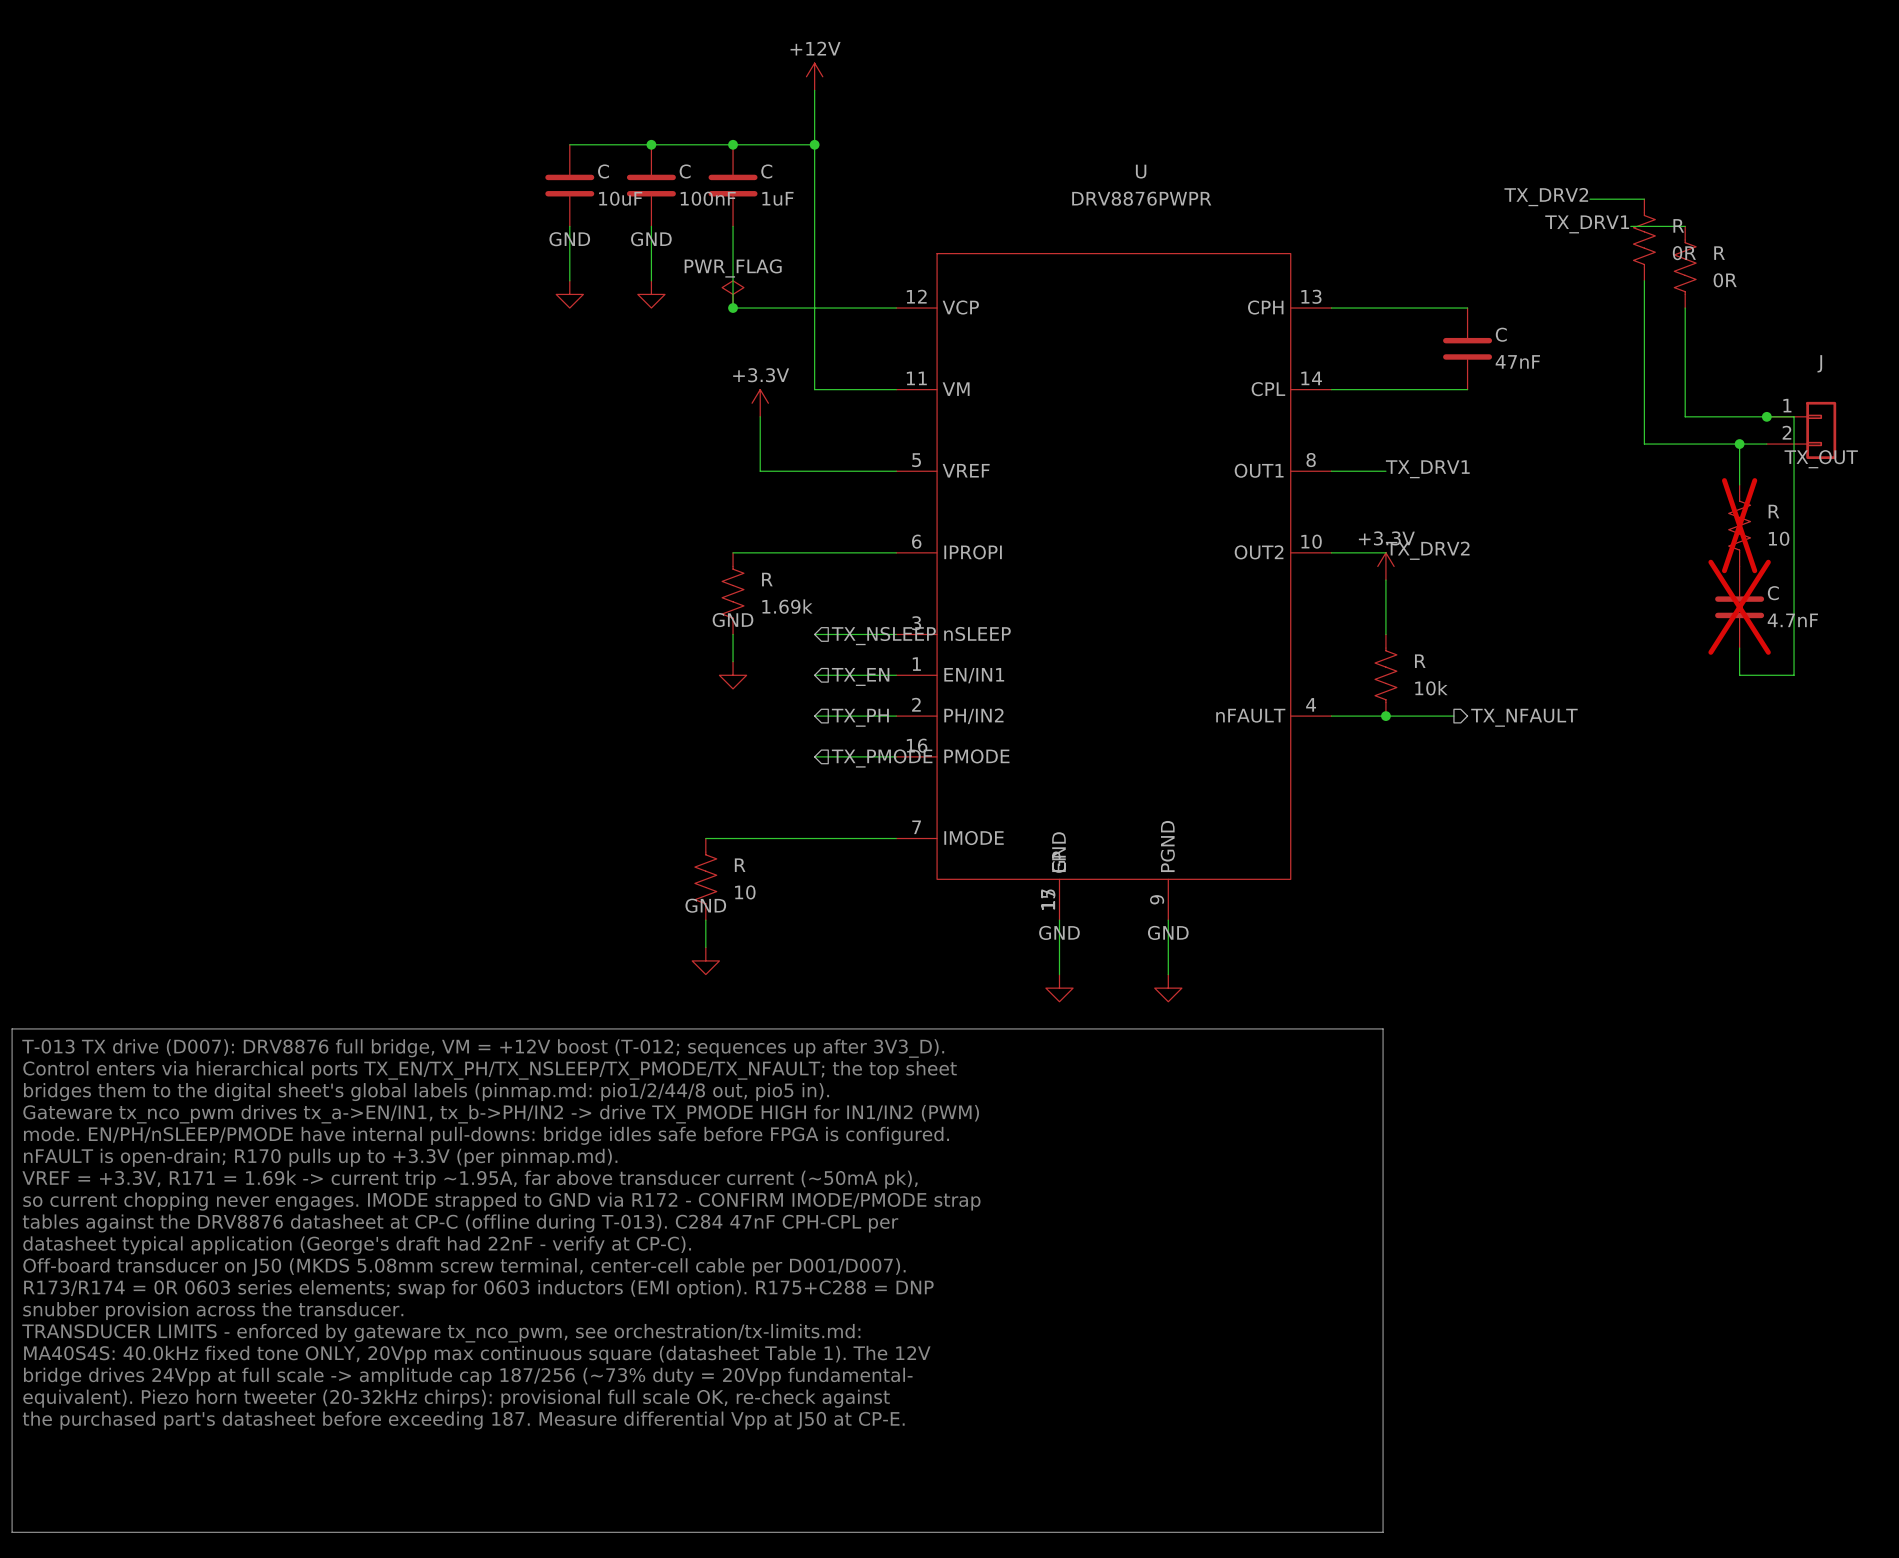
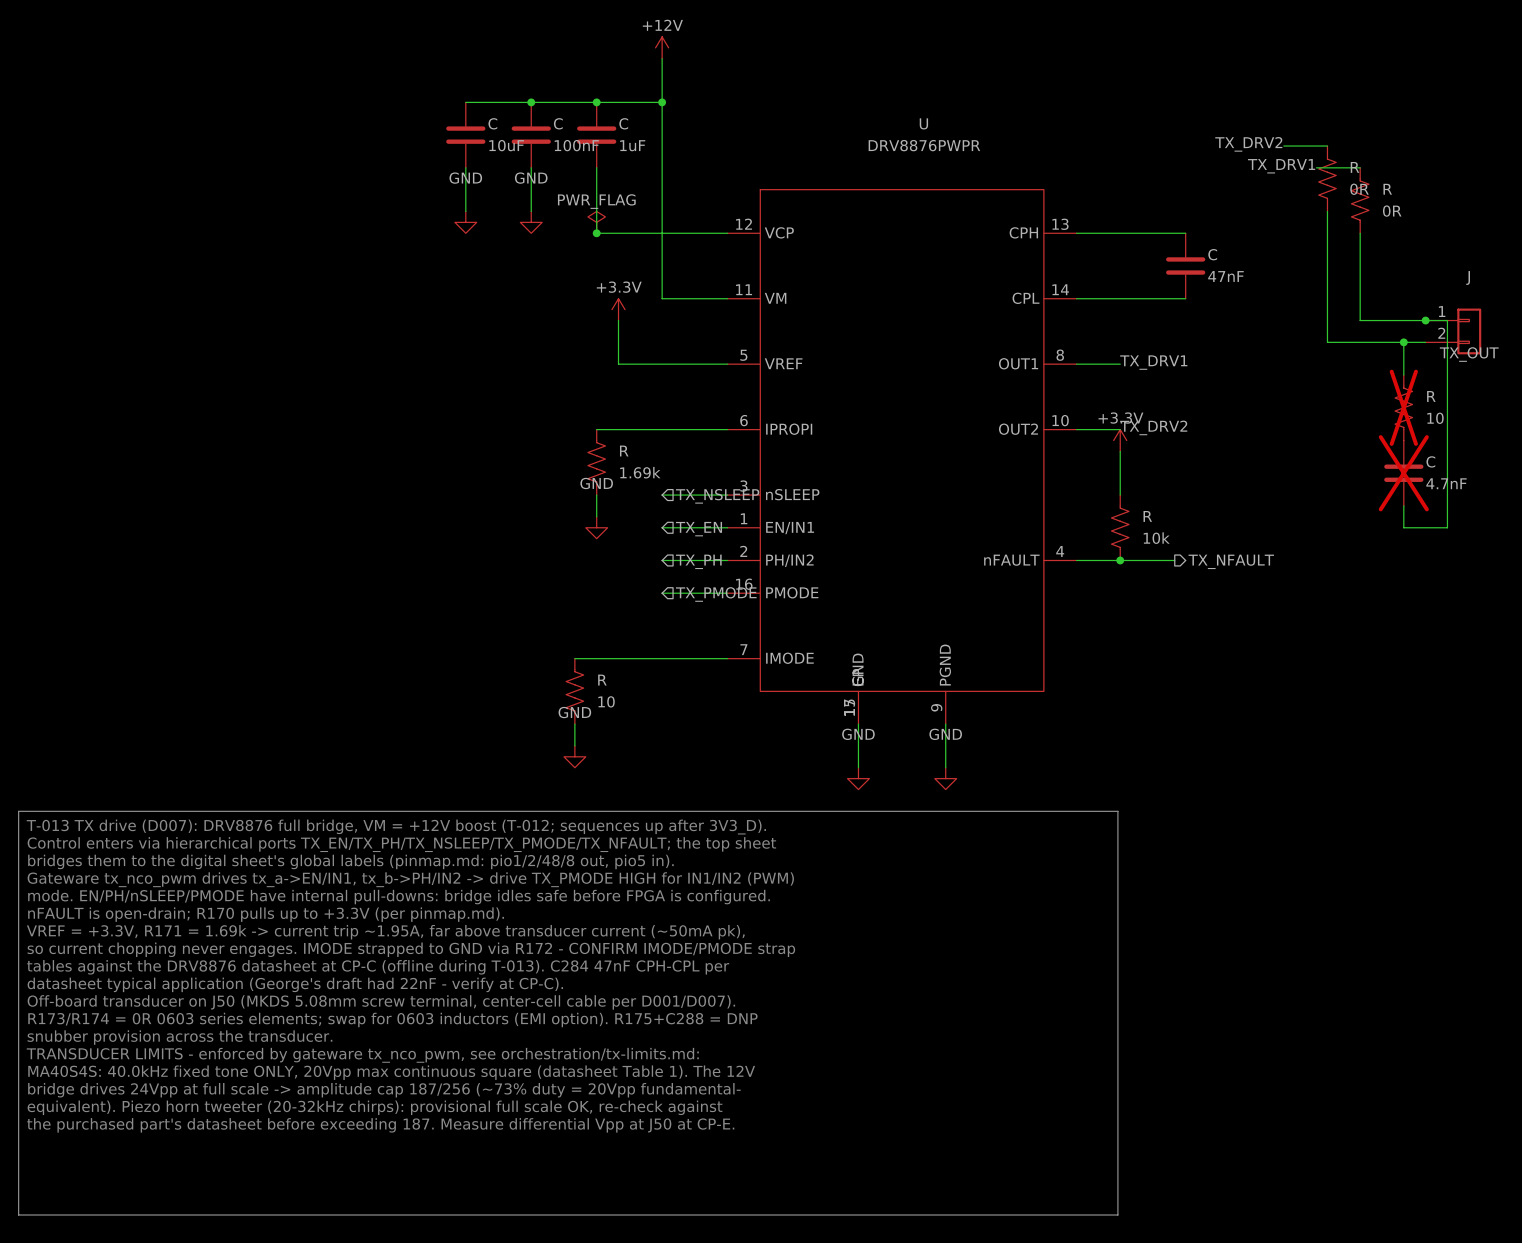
text: bridges them to the digital sheet's global labels (pinmap.md: pio1/2/44/8 out, pio5 in). (426, 1092) -> bridges them to the digital sheet's global labels (pinmap.md: pio1/2/48/8 out, pio5 in). (350, 861)

